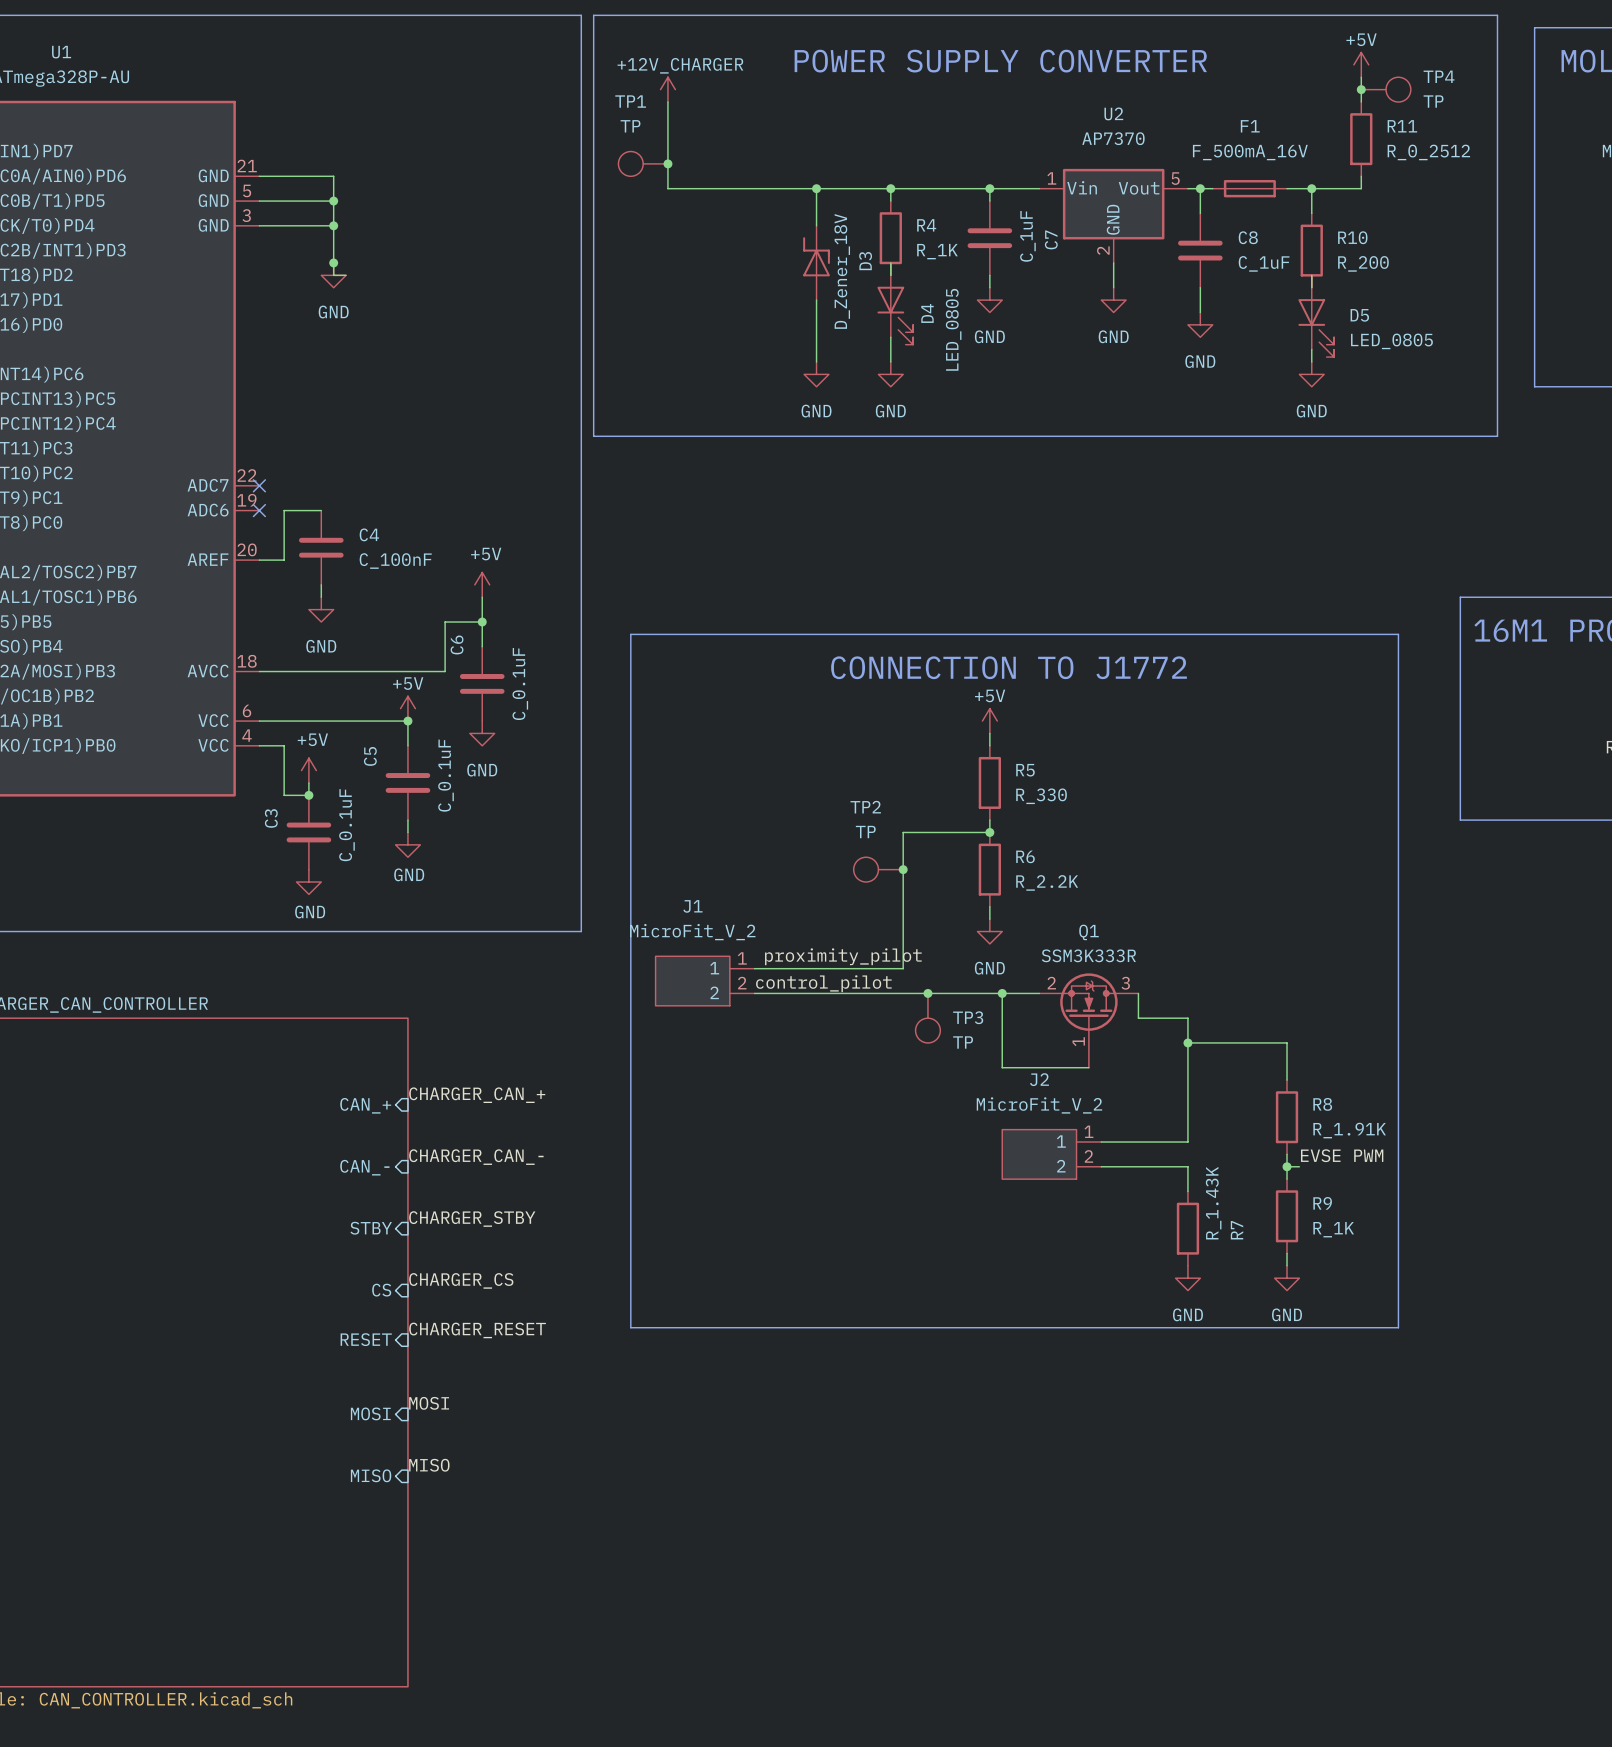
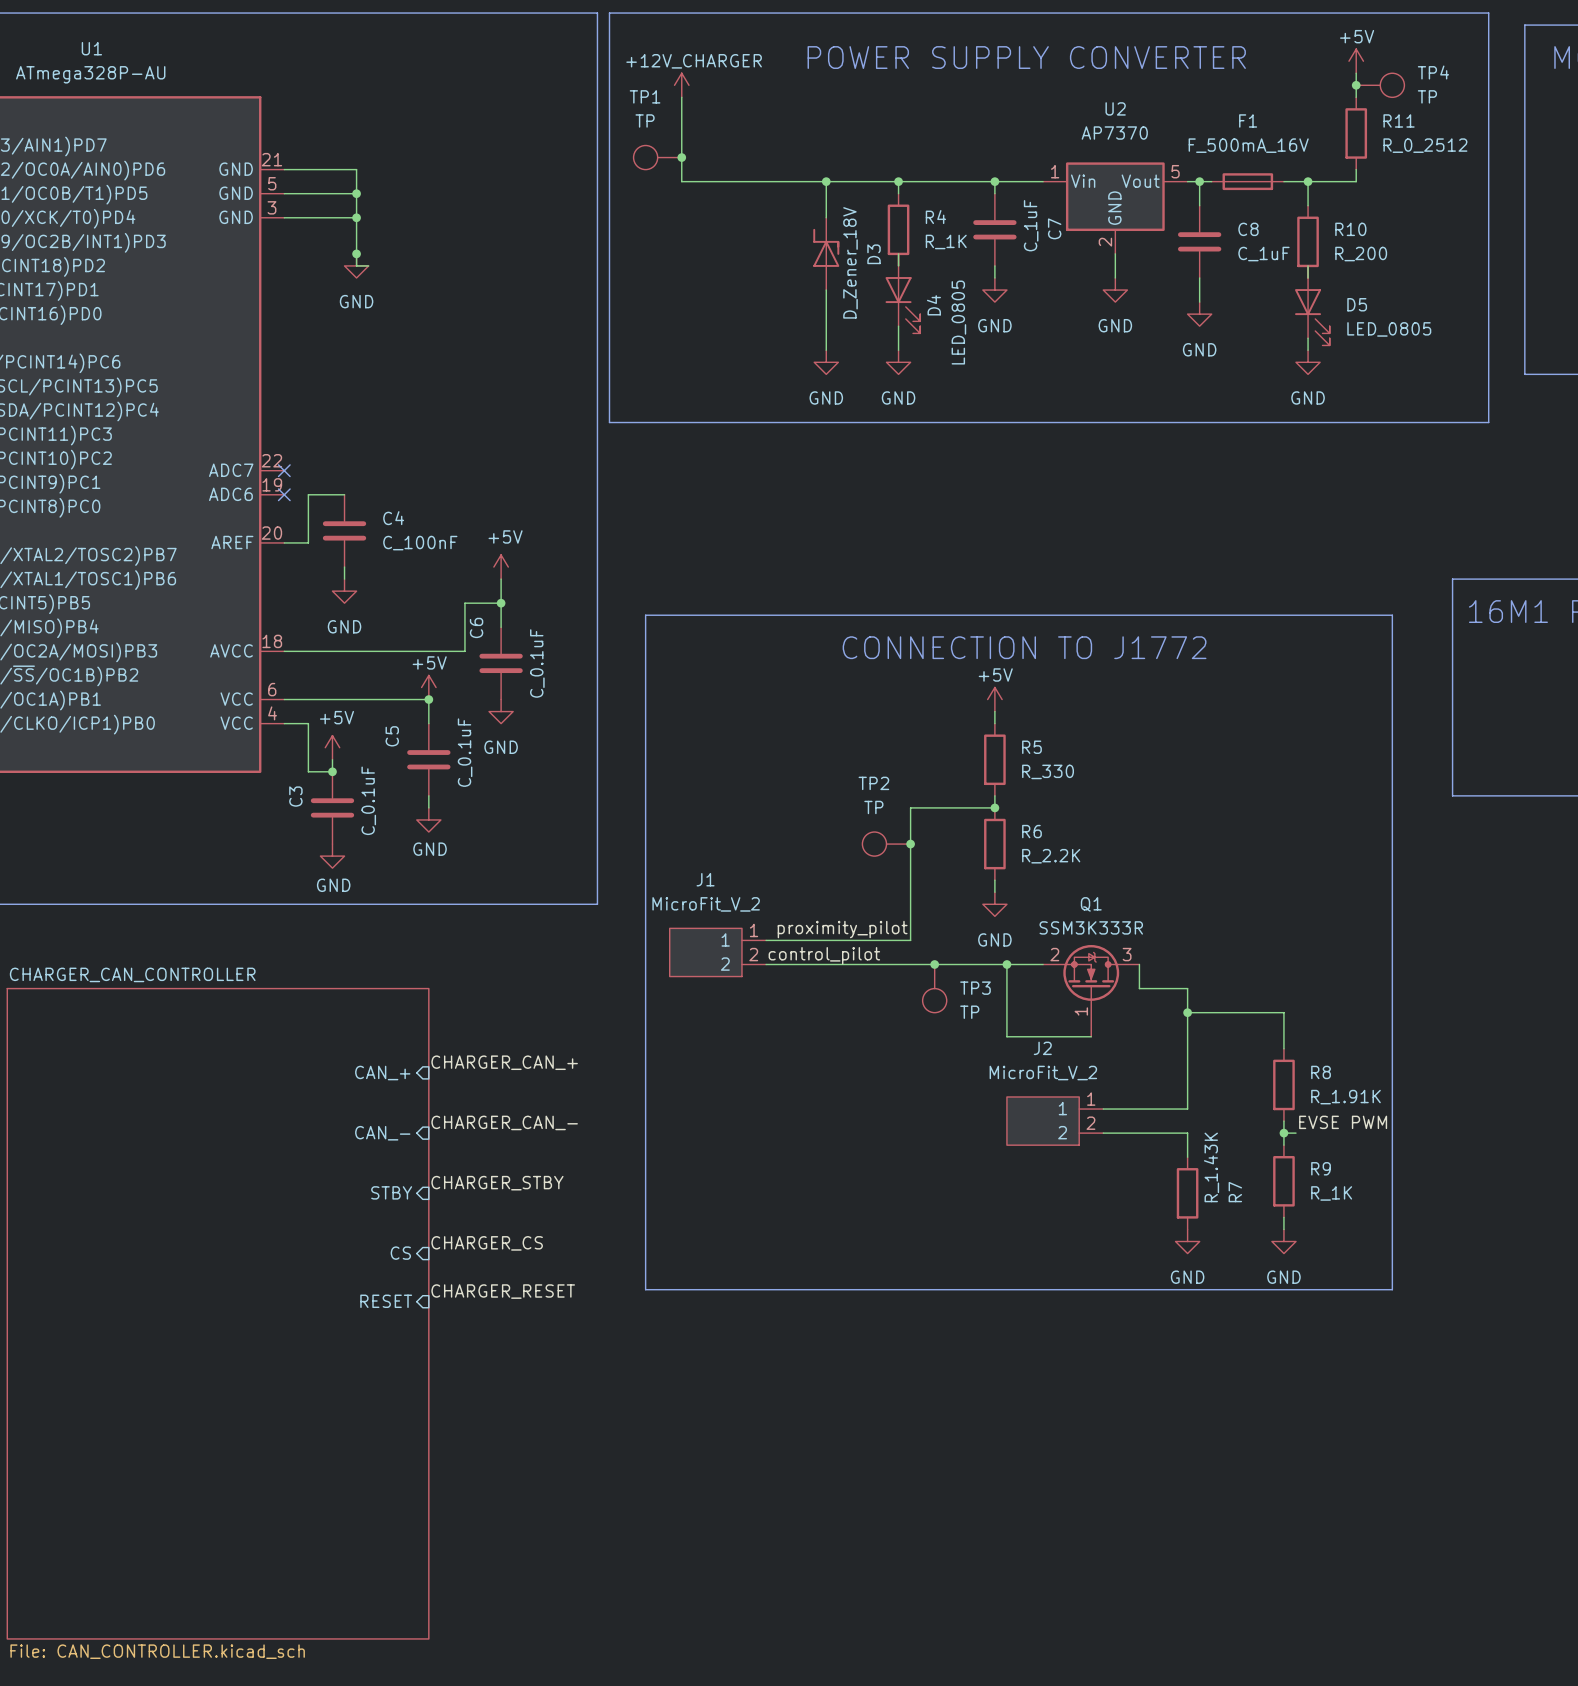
label: MOSI (429, 1403) -> none
sheet pin: MOSI (370, 1413) -> none
label: MISO (429, 1465) -> none
sheet pin: MISO (371, 1475) -> none

